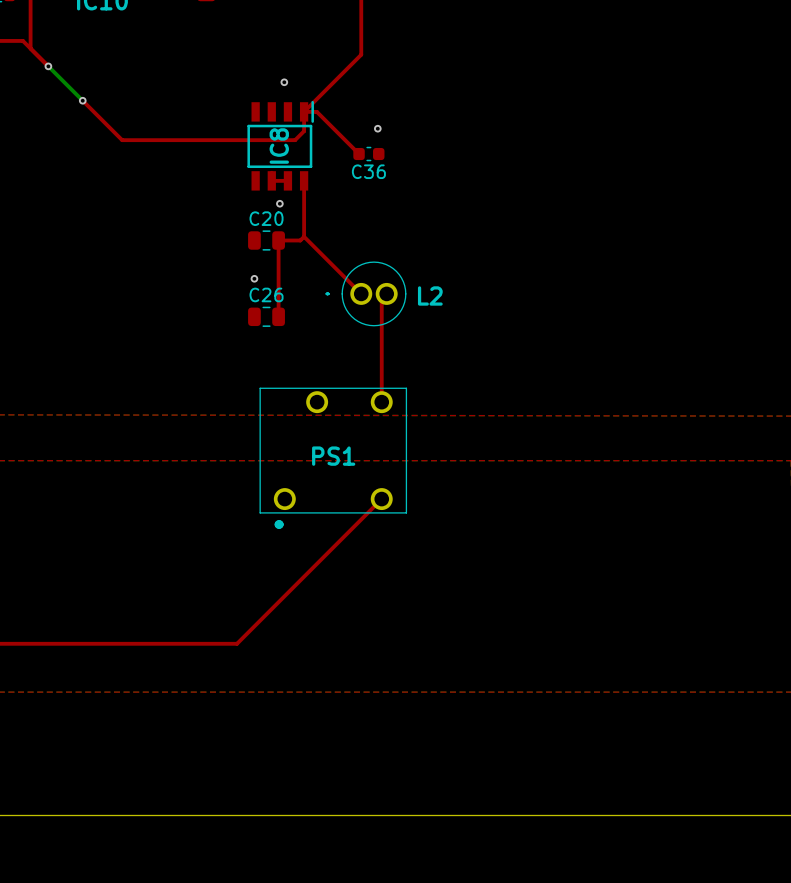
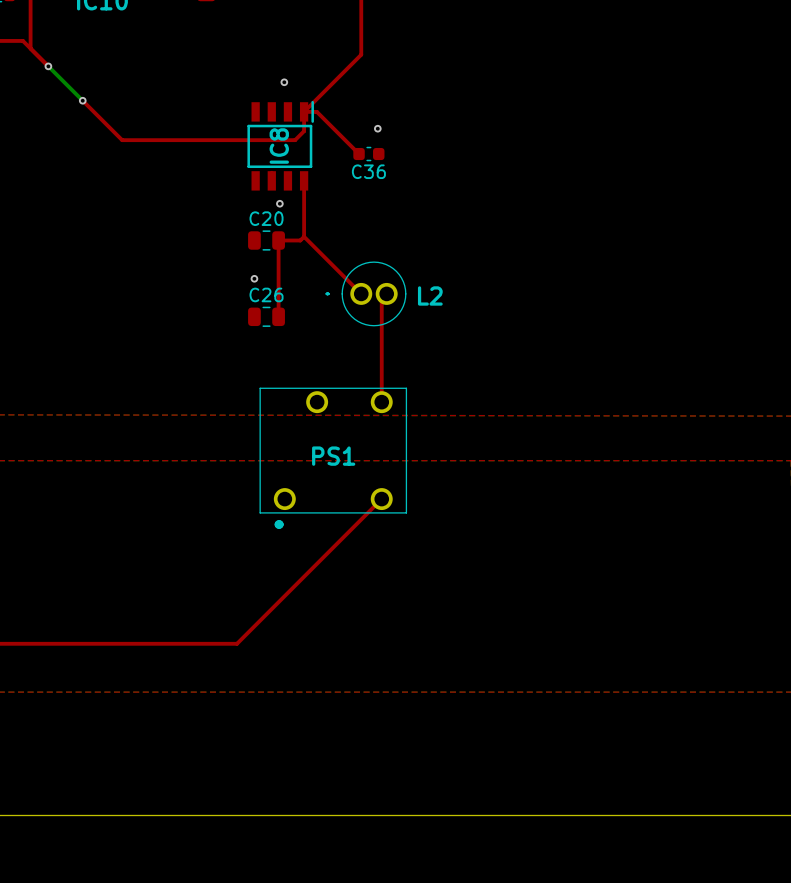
top track: (271, 180) (287, 180) -> none

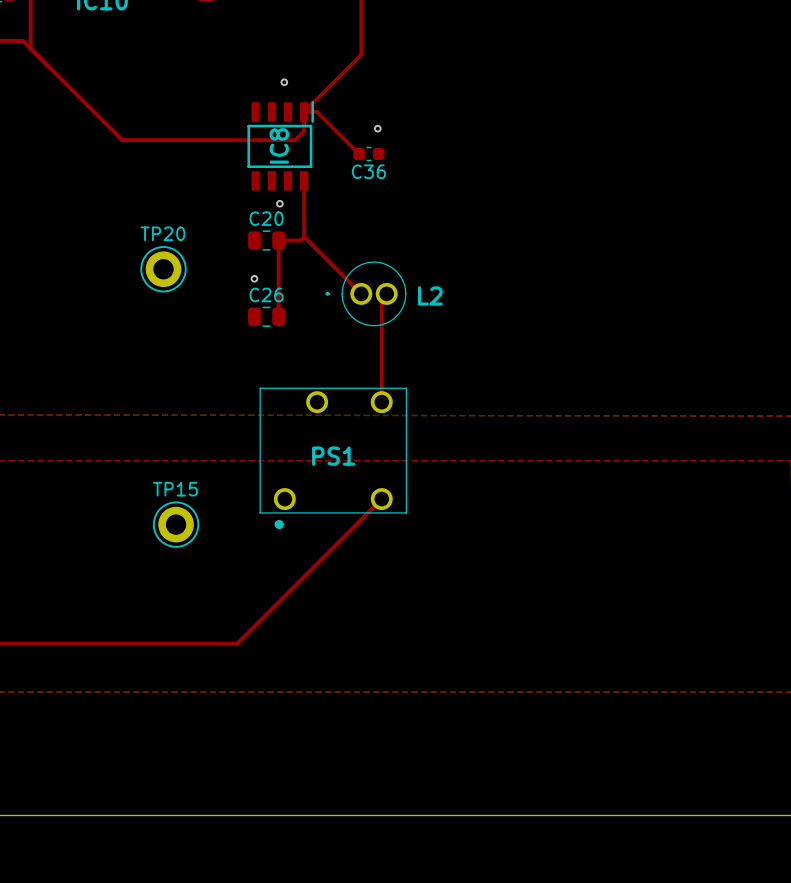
top track: none -> (48, 66) (82, 100)
bottom track: (48, 66) (82, 100) -> none
via: (48, 66) -> none
via: (82, 100) -> none
TP20: none -> (163, 269)
TP15: none -> (176, 524)

